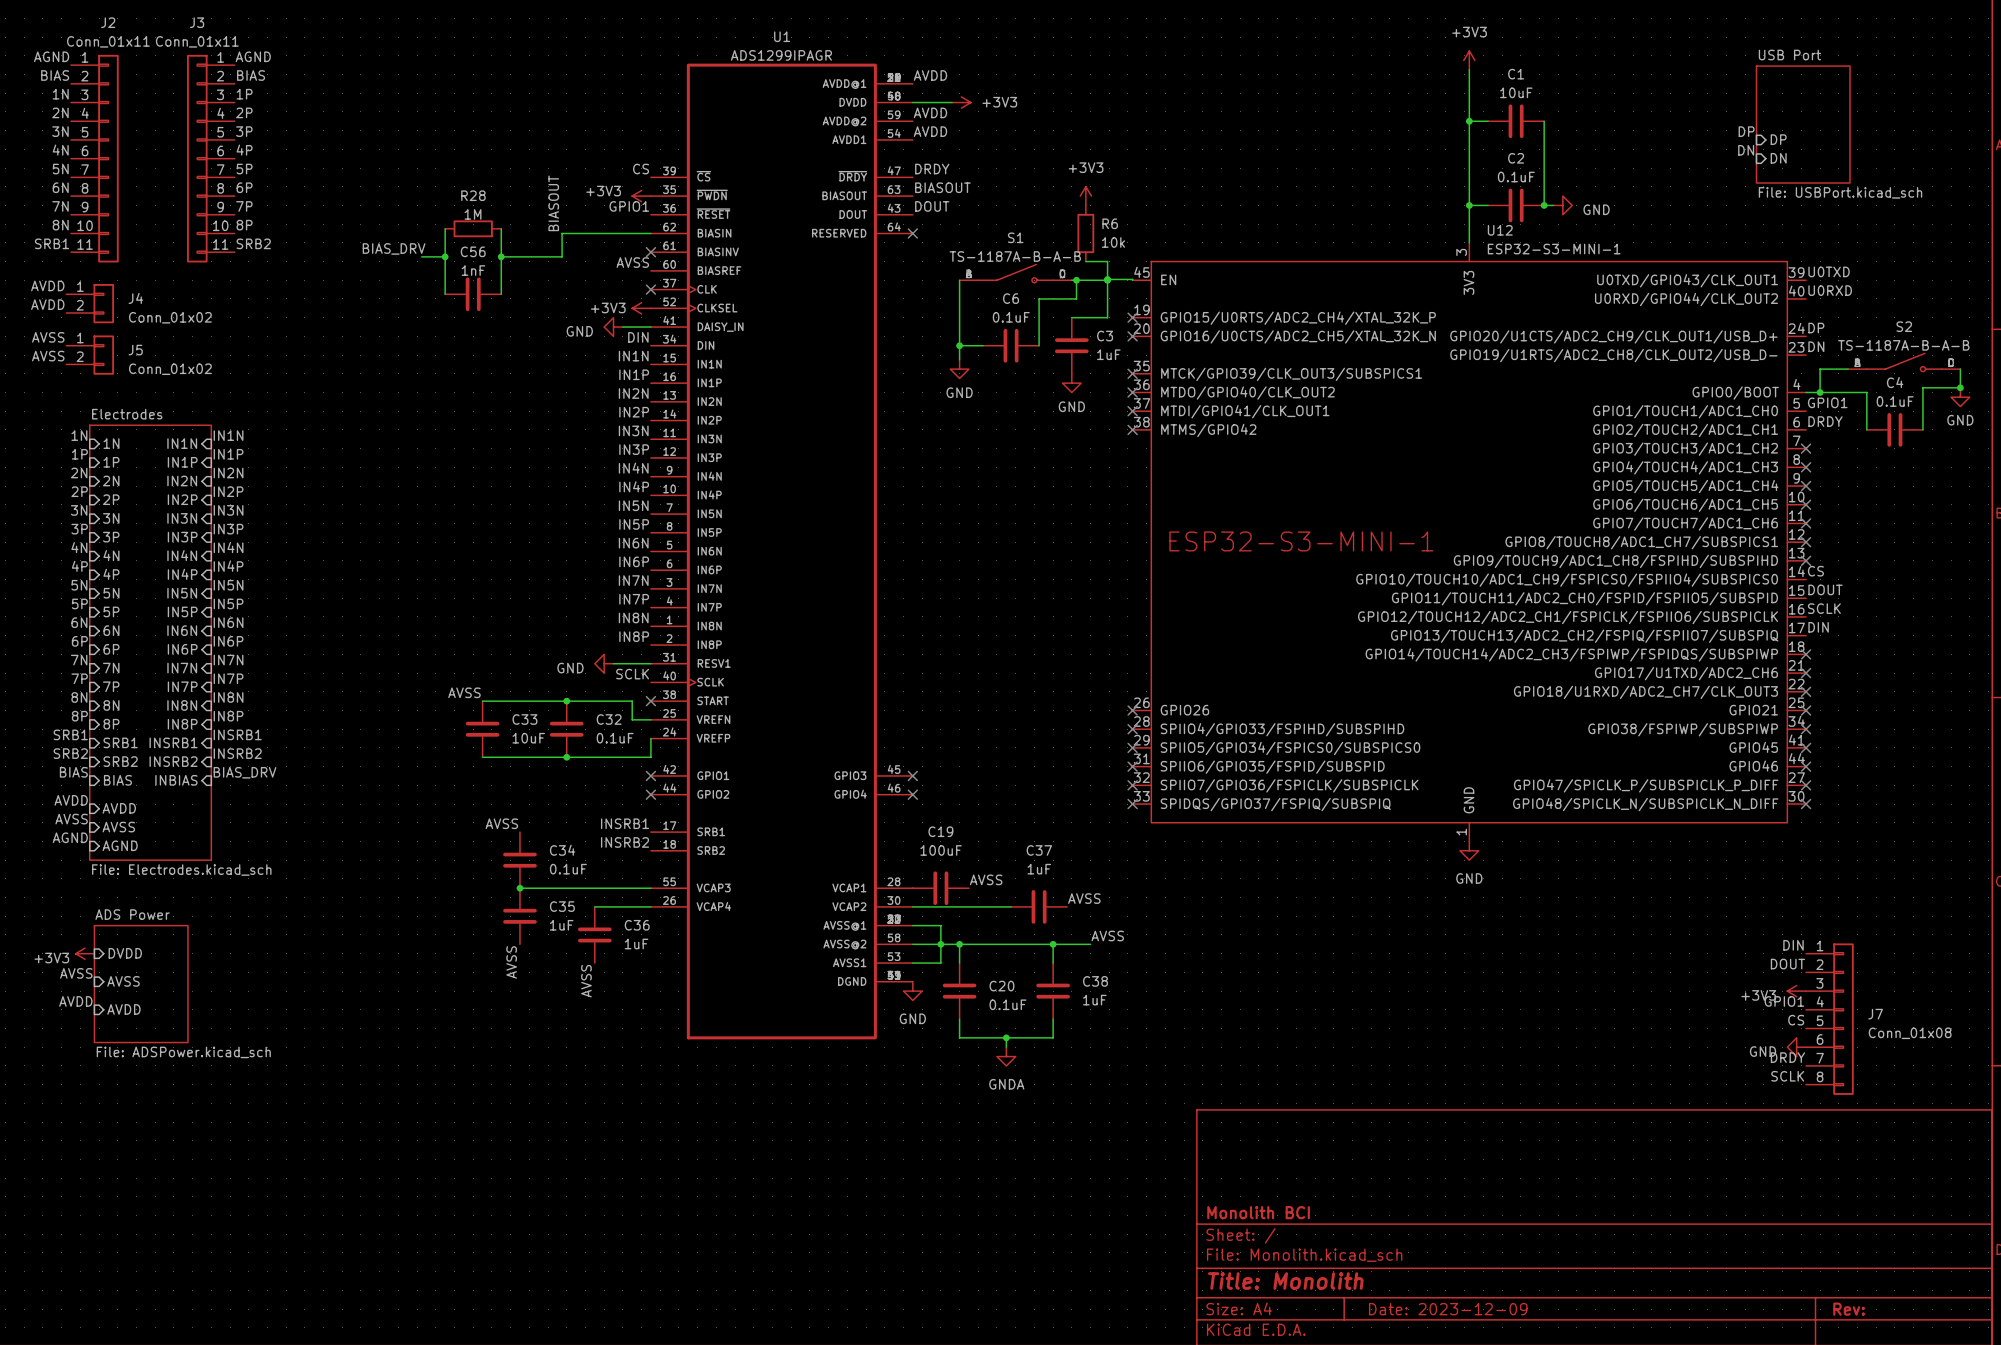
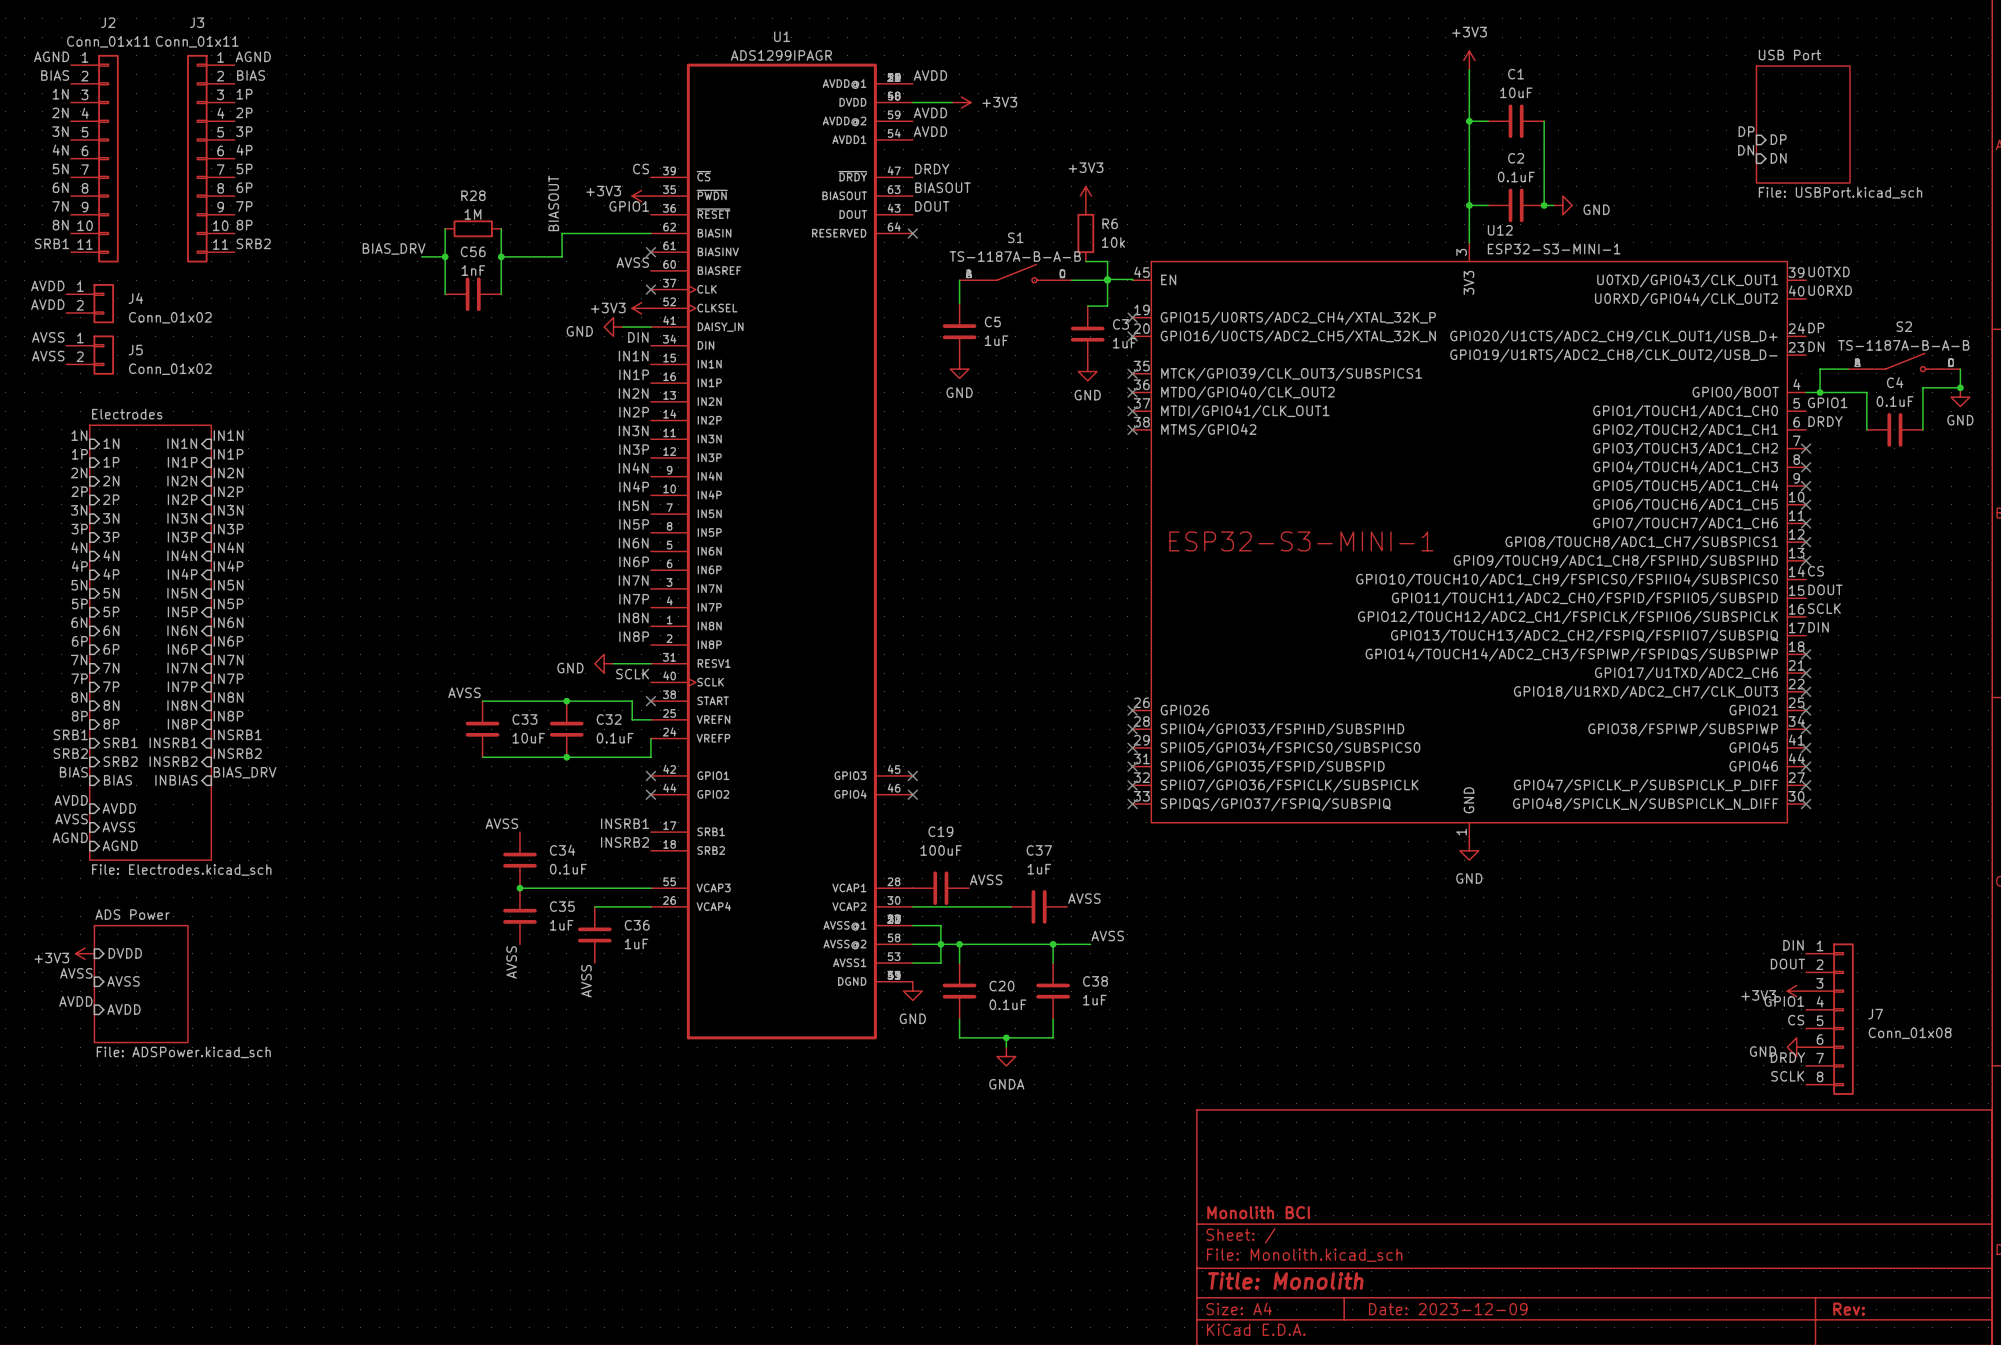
wire: (1076, 280) (1076, 298) (1039, 298) (1039, 345) -> none
junction: (1076, 280) -> none
wire: (1107, 306) (1107, 317) (1071, 317) -> (1107, 306) (1087, 306)
C5: none -> 1uF (959, 331)
wire: (959, 345) (982, 345) -> none
junction: (959, 345) -> none
C6: 0.1uF (1011, 345) -> none
C3 position: (1071, 345) -> (1087, 334)
power symbol position: GND (1071, 383) -> GND (1087, 371)

